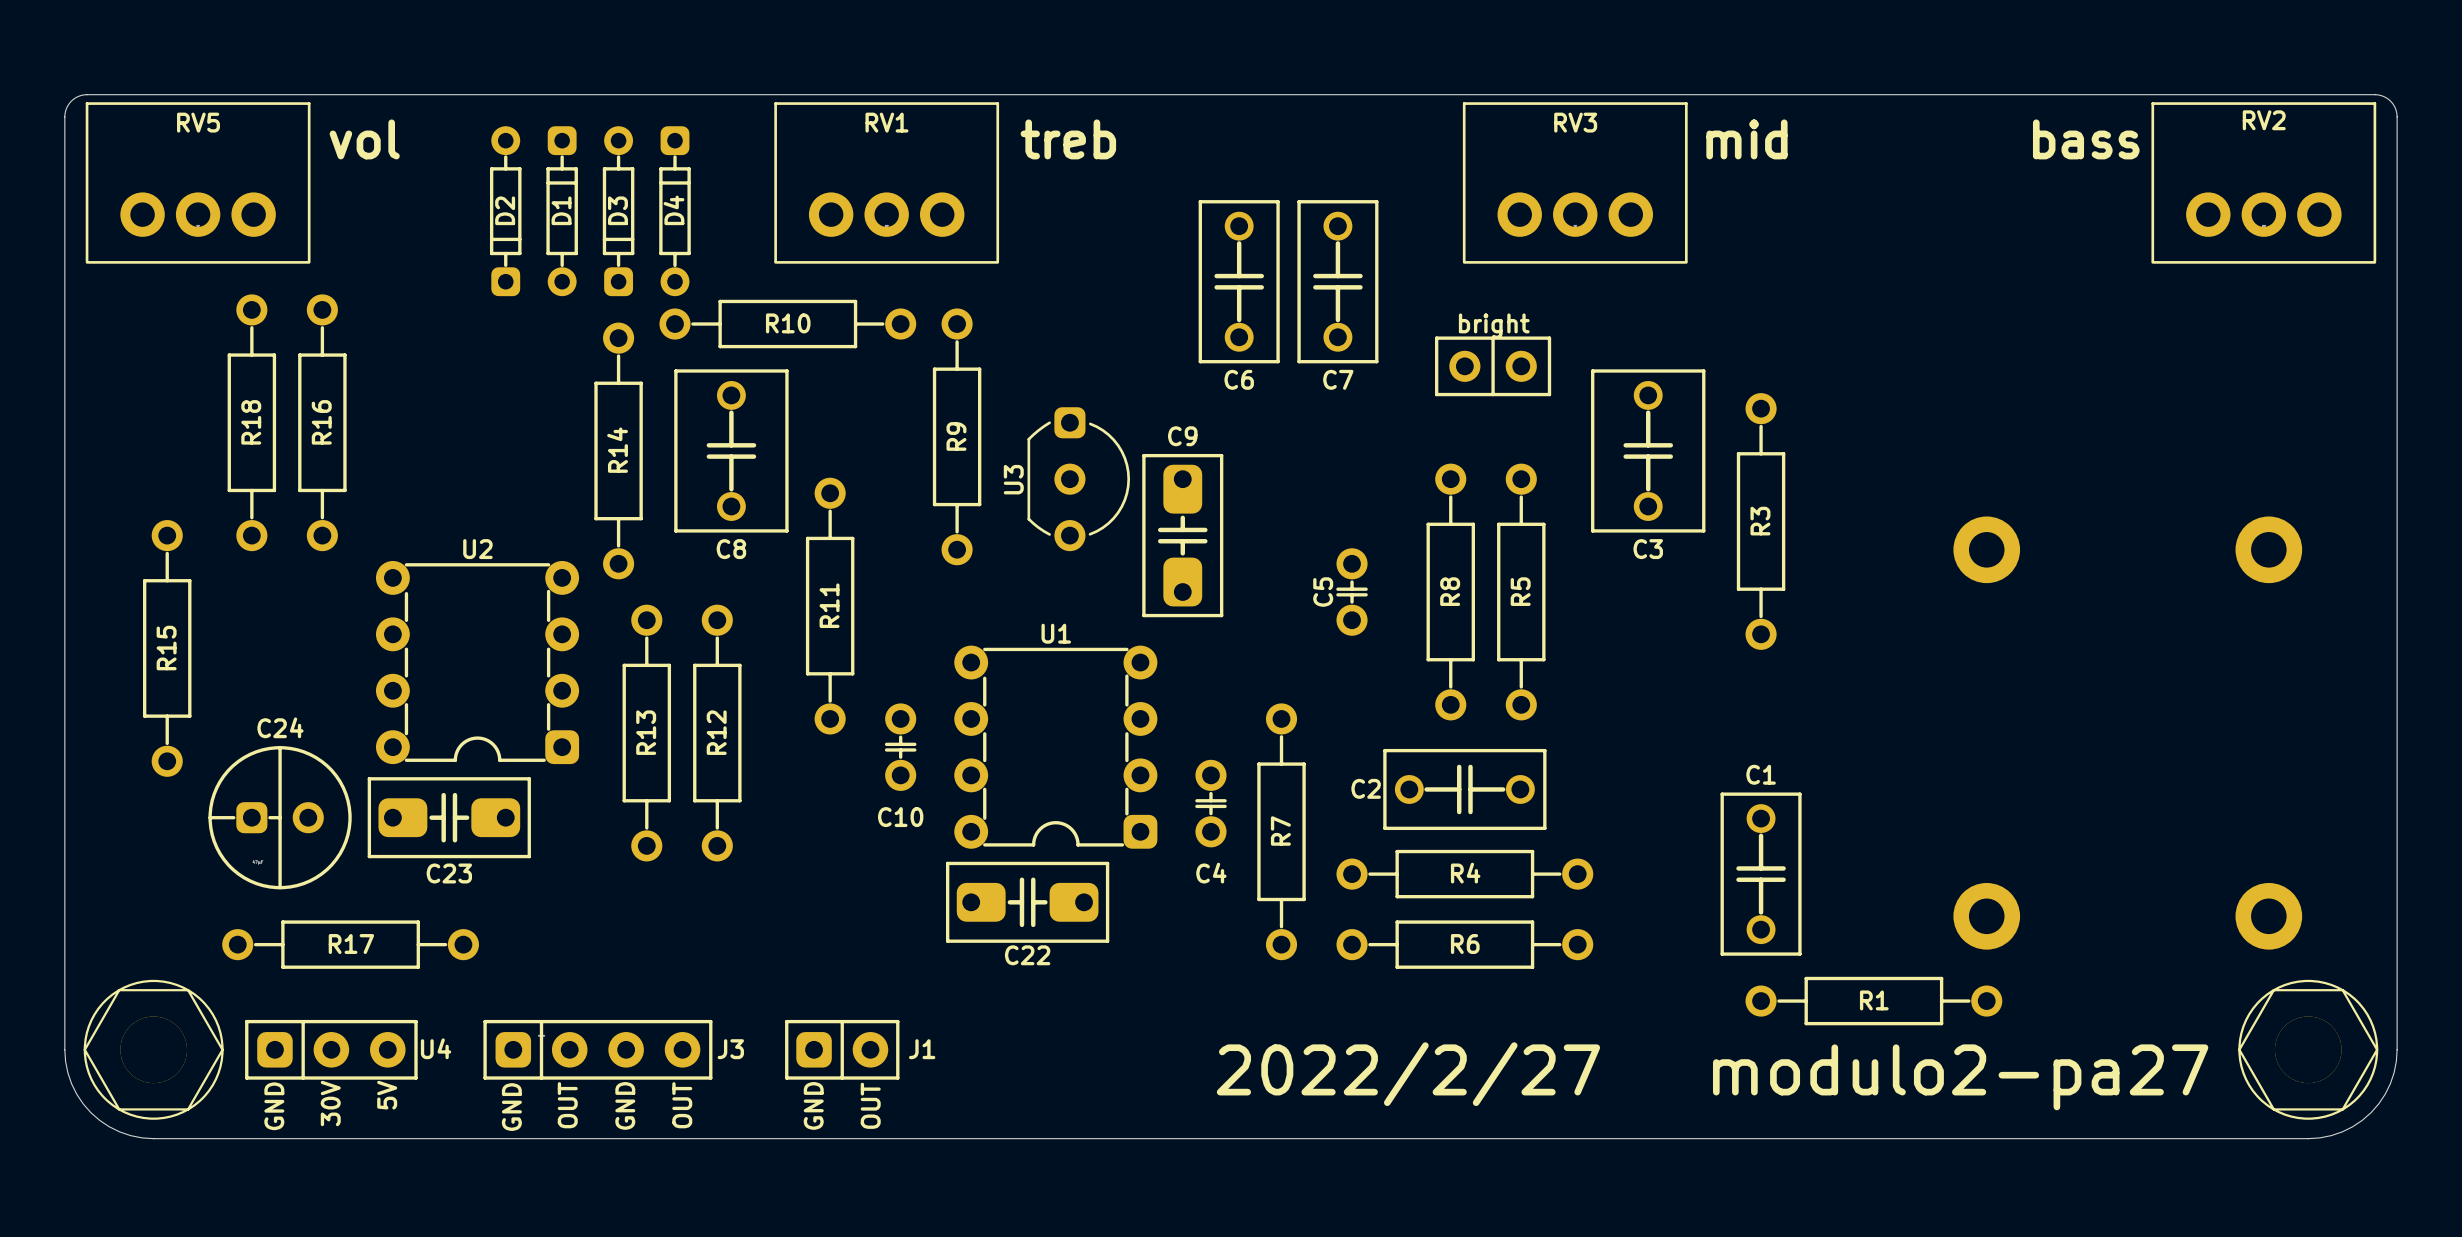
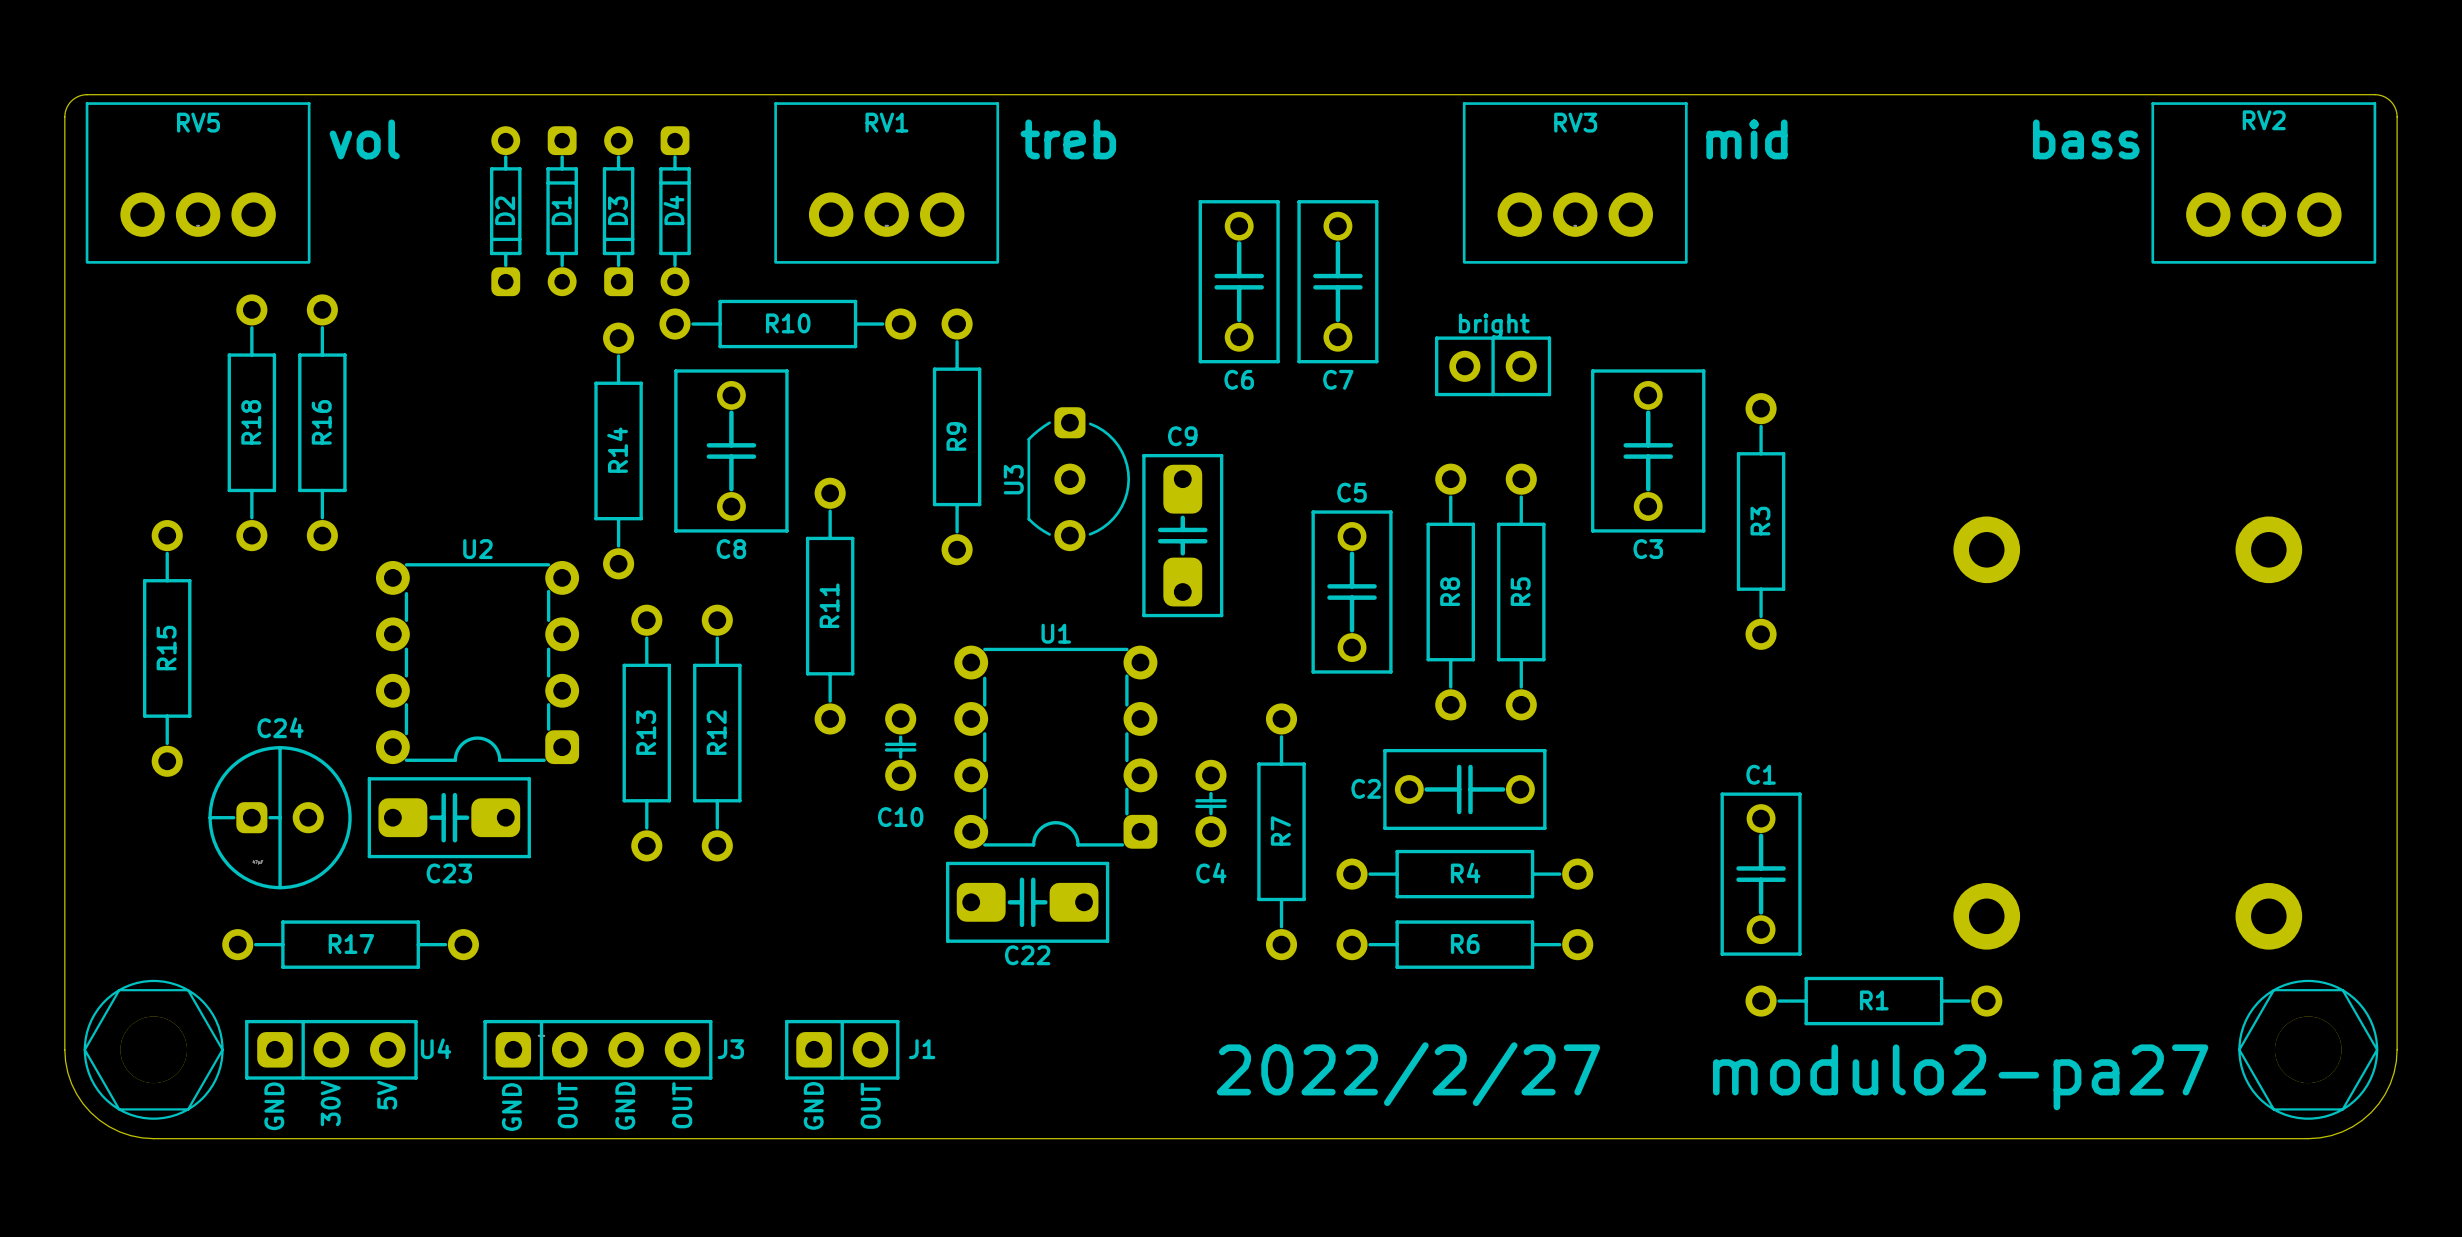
C5 footprint: [1336, 548, 1368, 636] -> [1311, 510, 1393, 674]
C5 name position: C5 (1323, 592) -> C5 (1352, 492)

